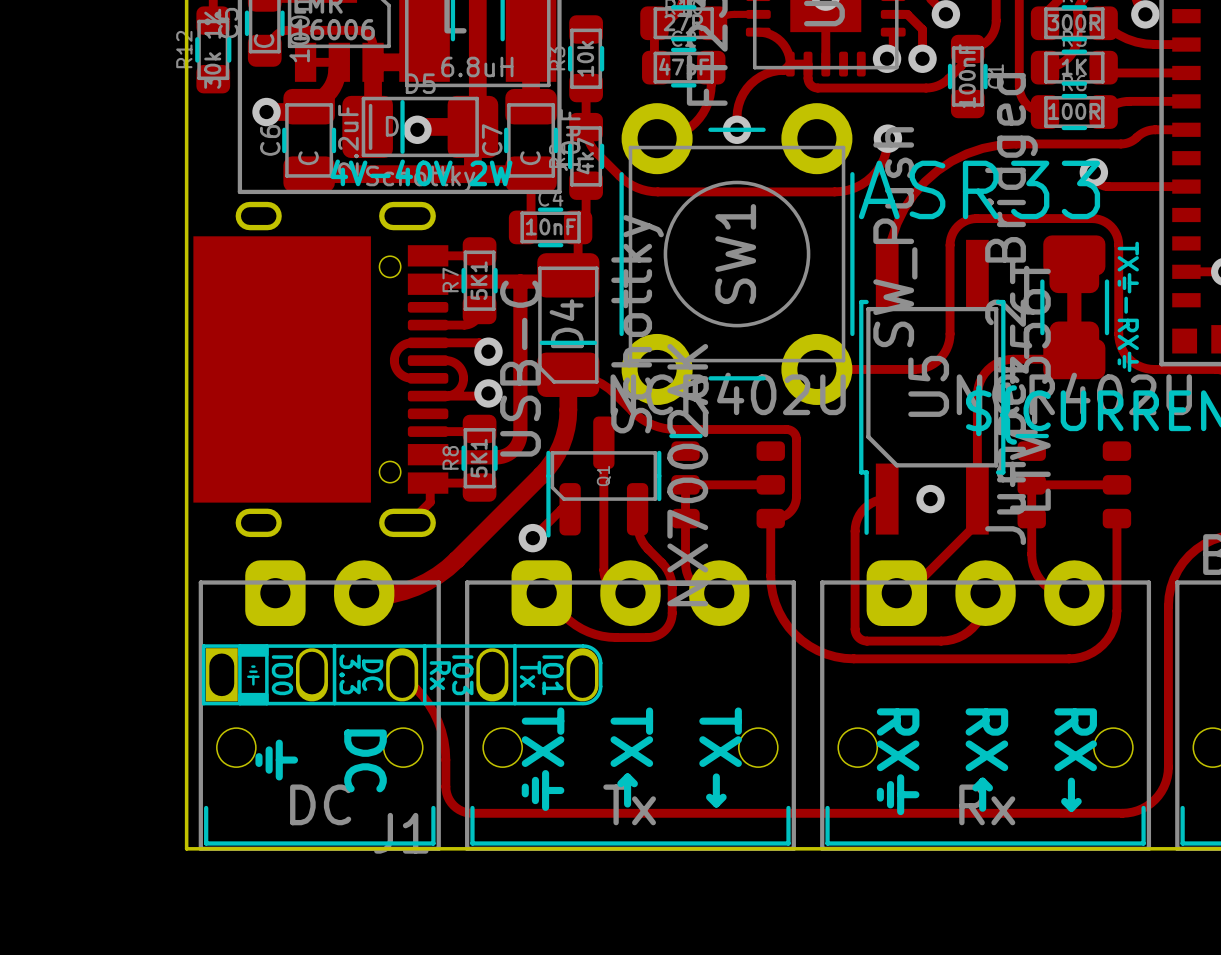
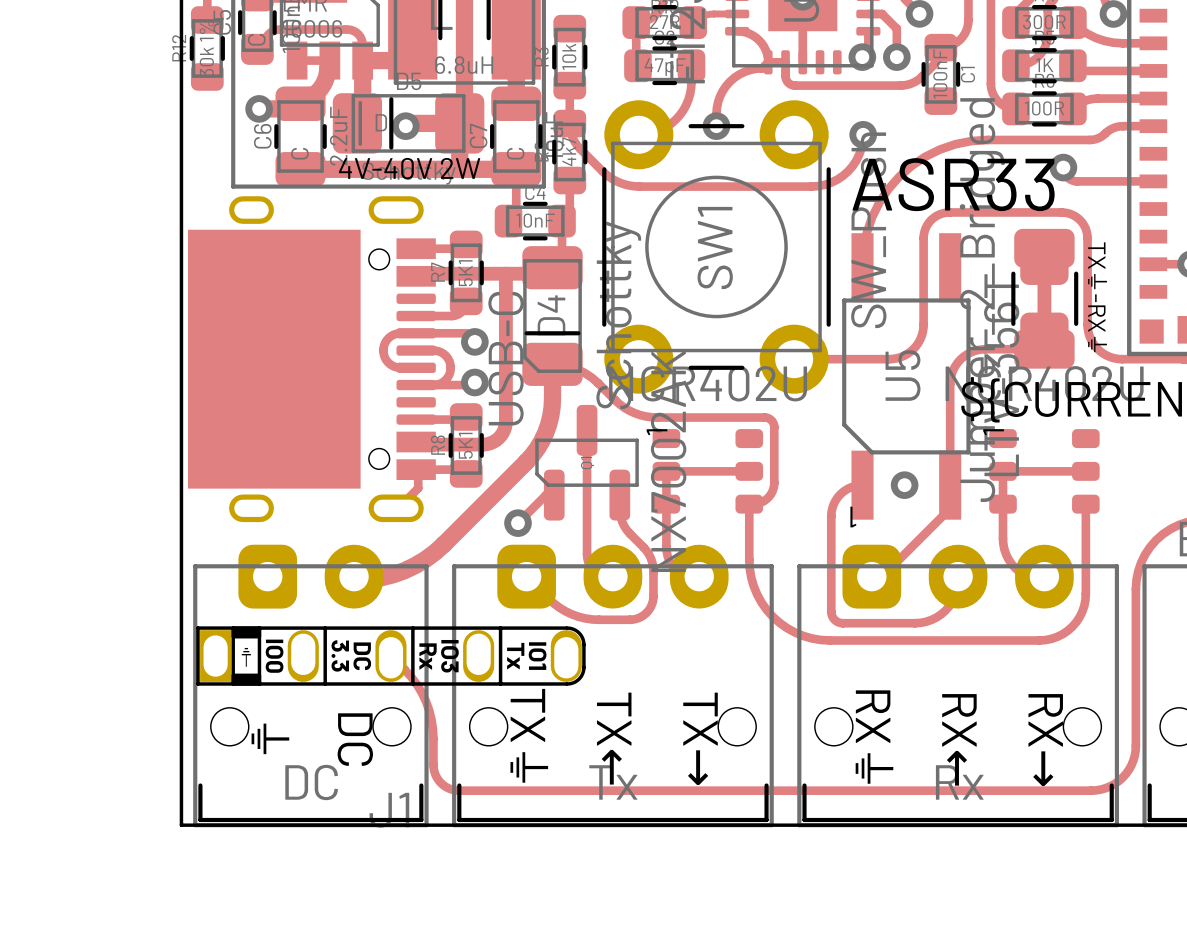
U5 footprint: [859, 239, 1006, 535] -> [842, 233, 971, 520]
Q1 footprint: [546, 416, 662, 538] -> [535, 404, 639, 521]
part footprint: [669, 433, 785, 529] -> [652, 429, 764, 514]
part footprint: [1015, 433, 1132, 529] -> [989, 429, 1100, 514]

